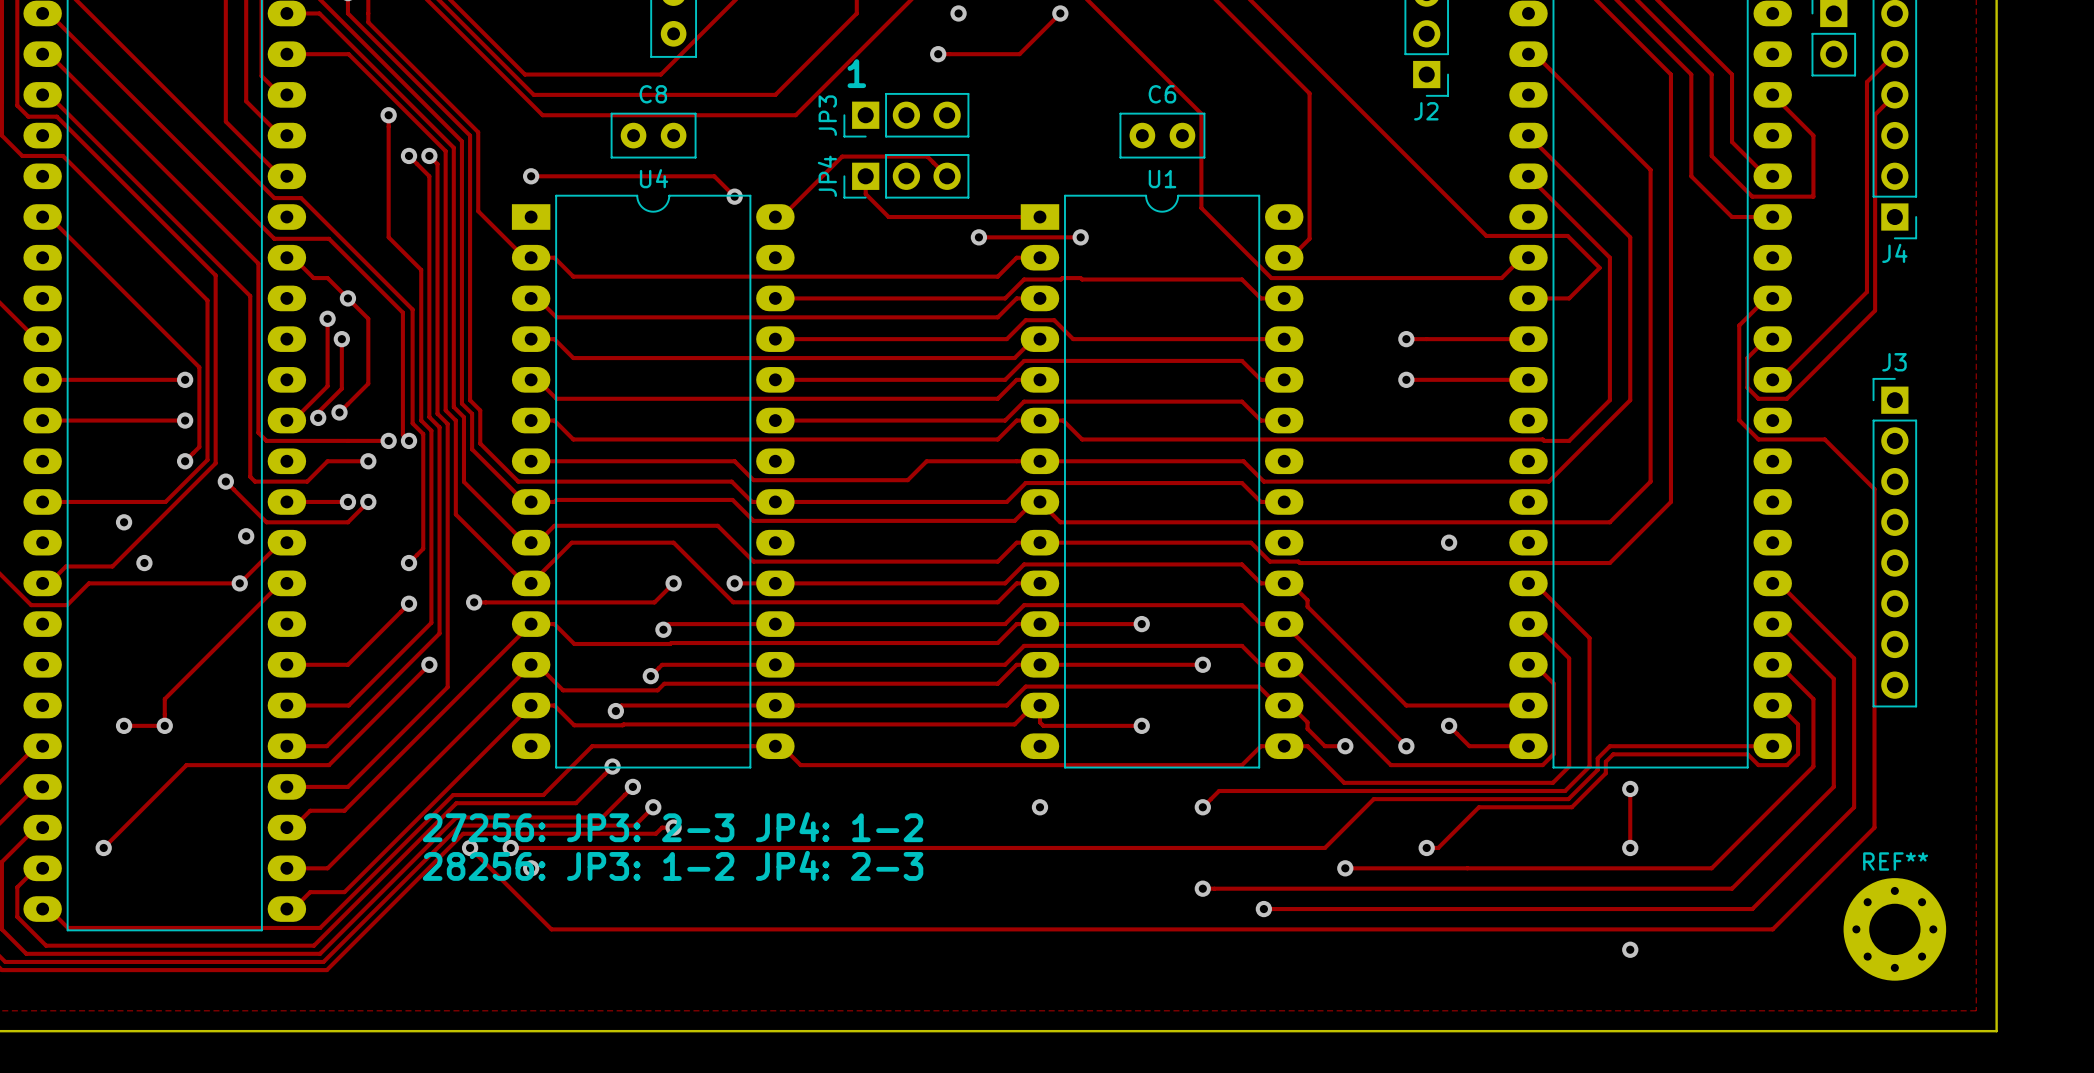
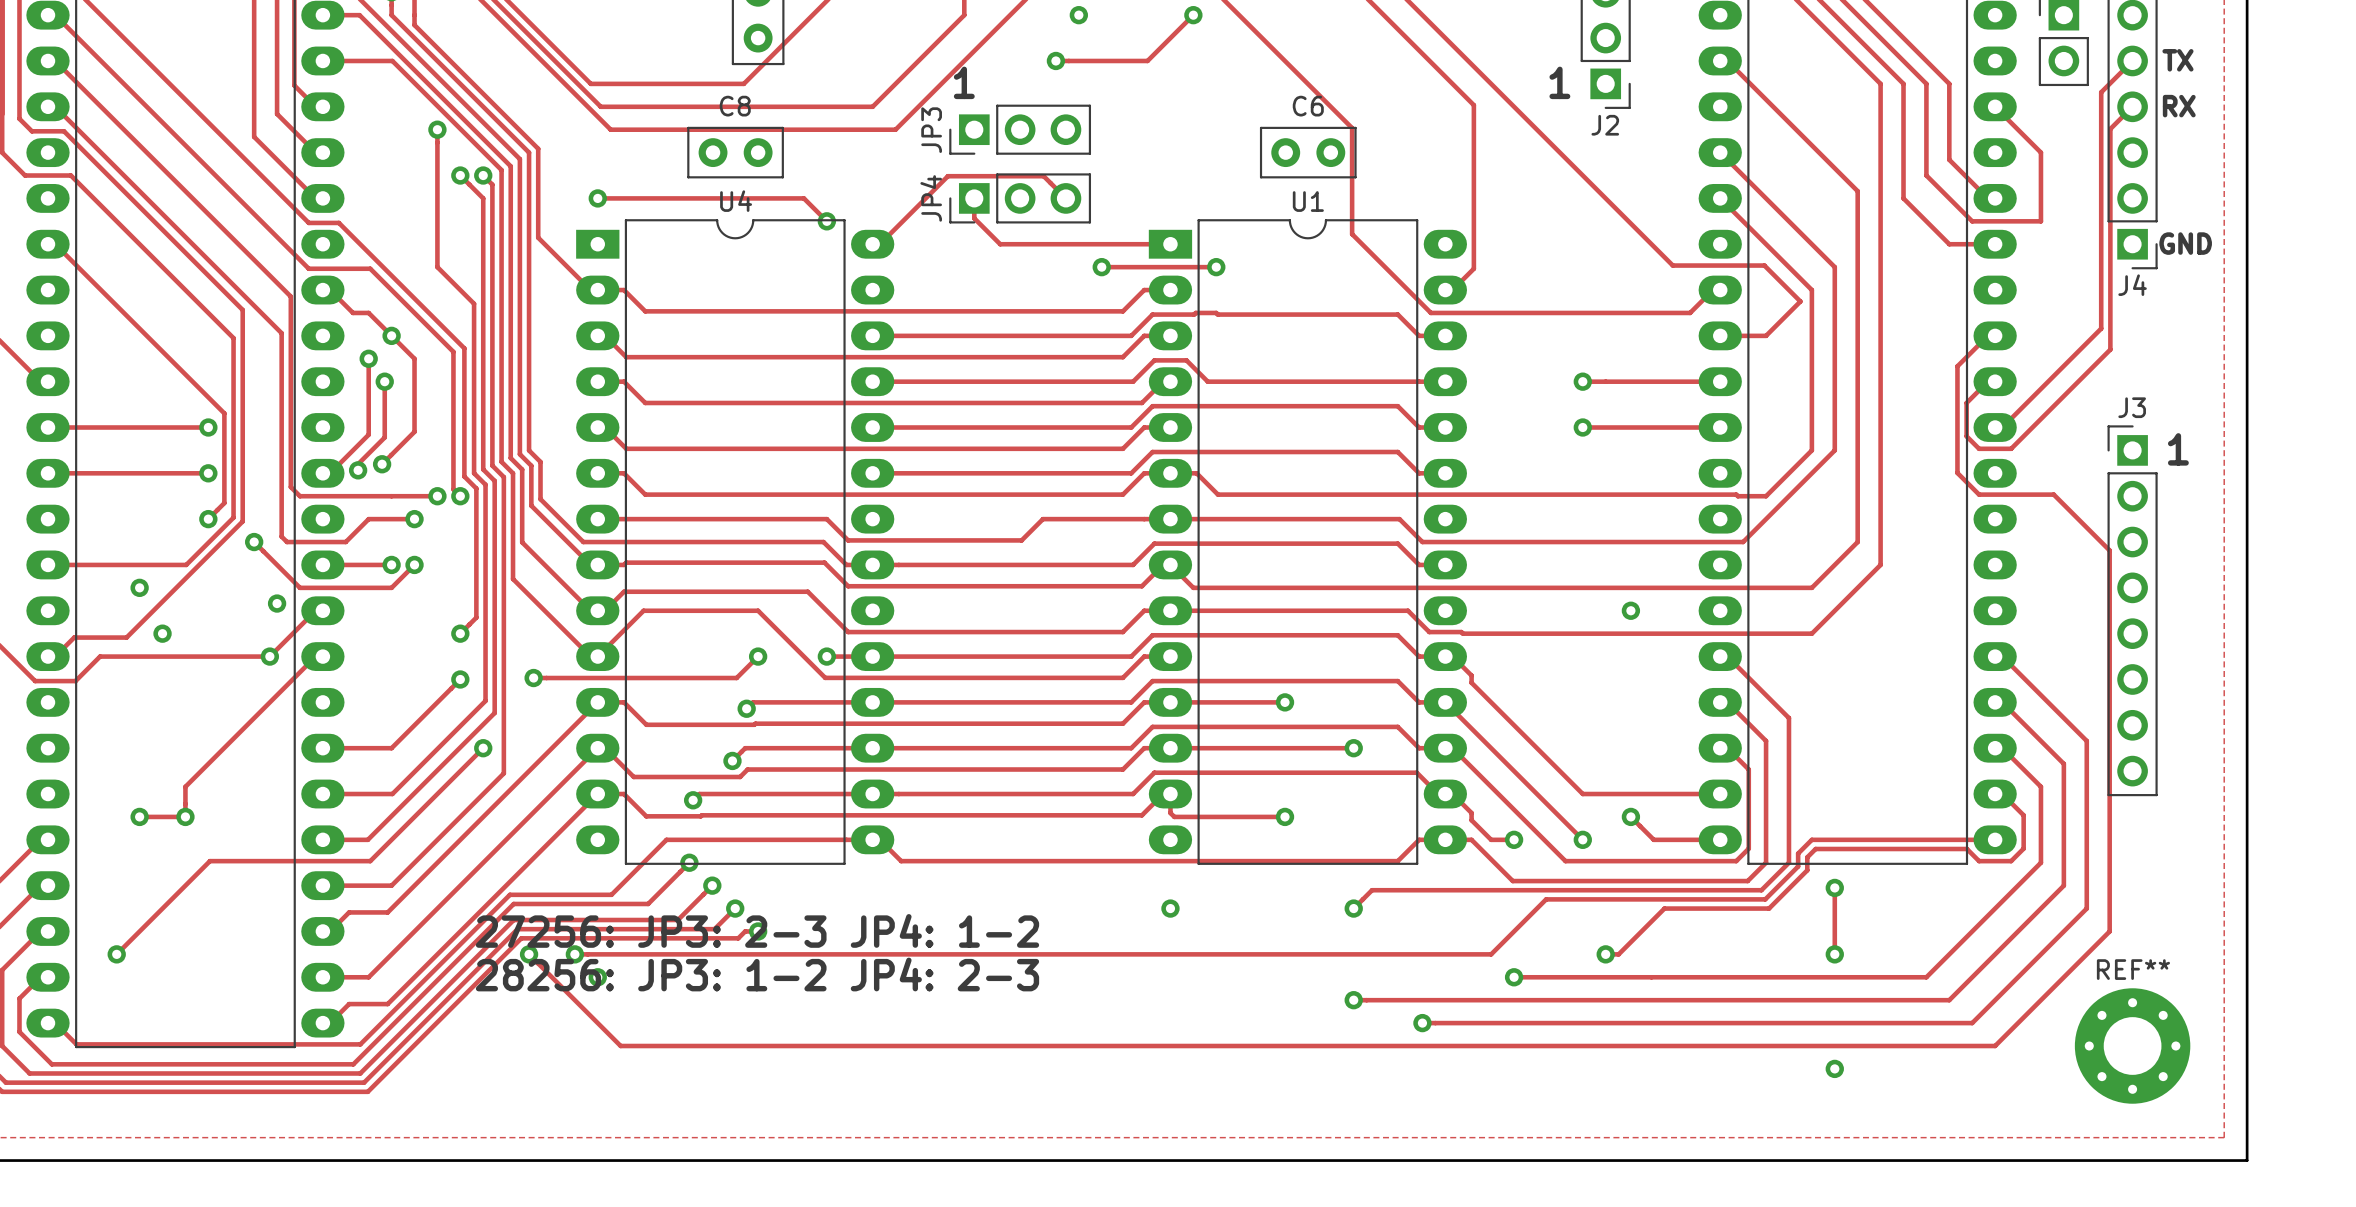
text: none -> TX (2177, 60)
text: none -> 1 (1559, 82)
text: none -> RX (2179, 106)
text: none -> GND (2185, 243)
text: none -> 1 (2178, 449)

